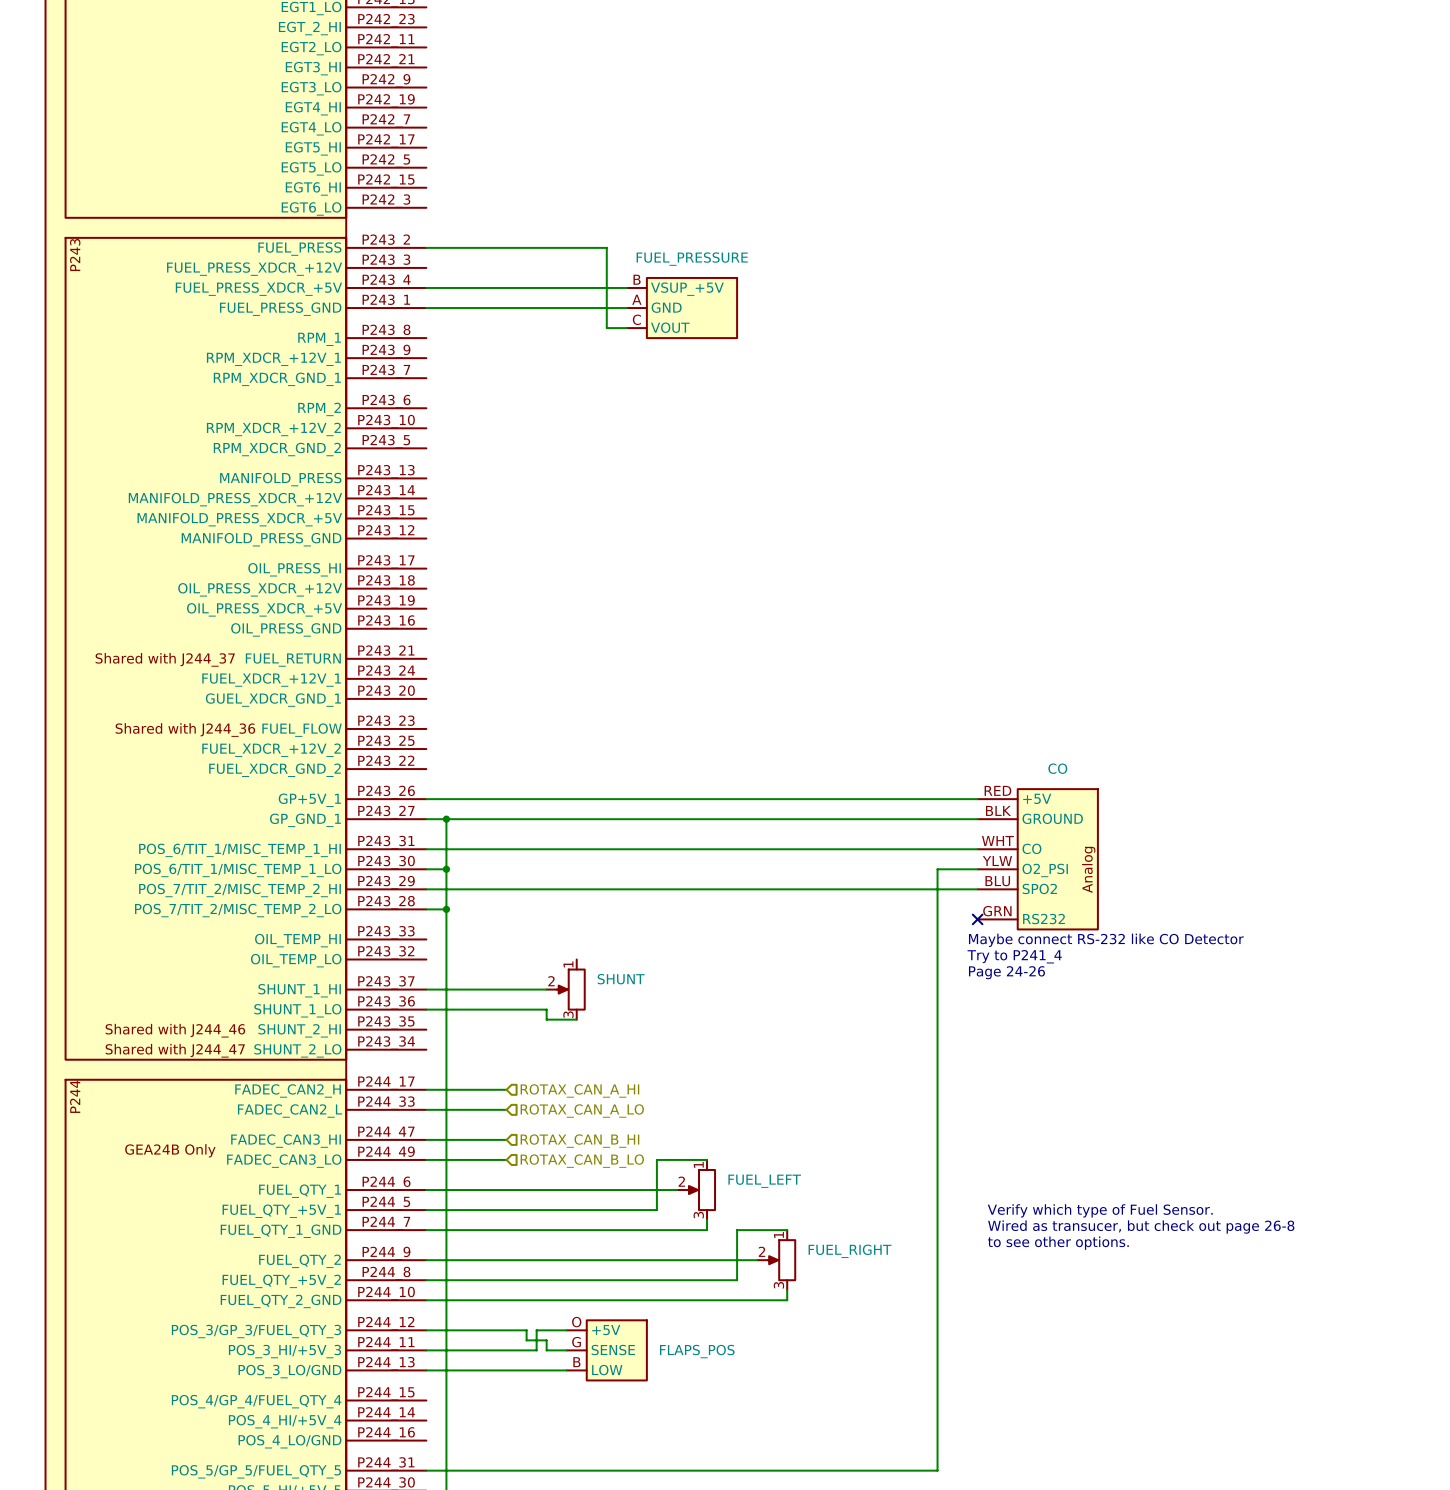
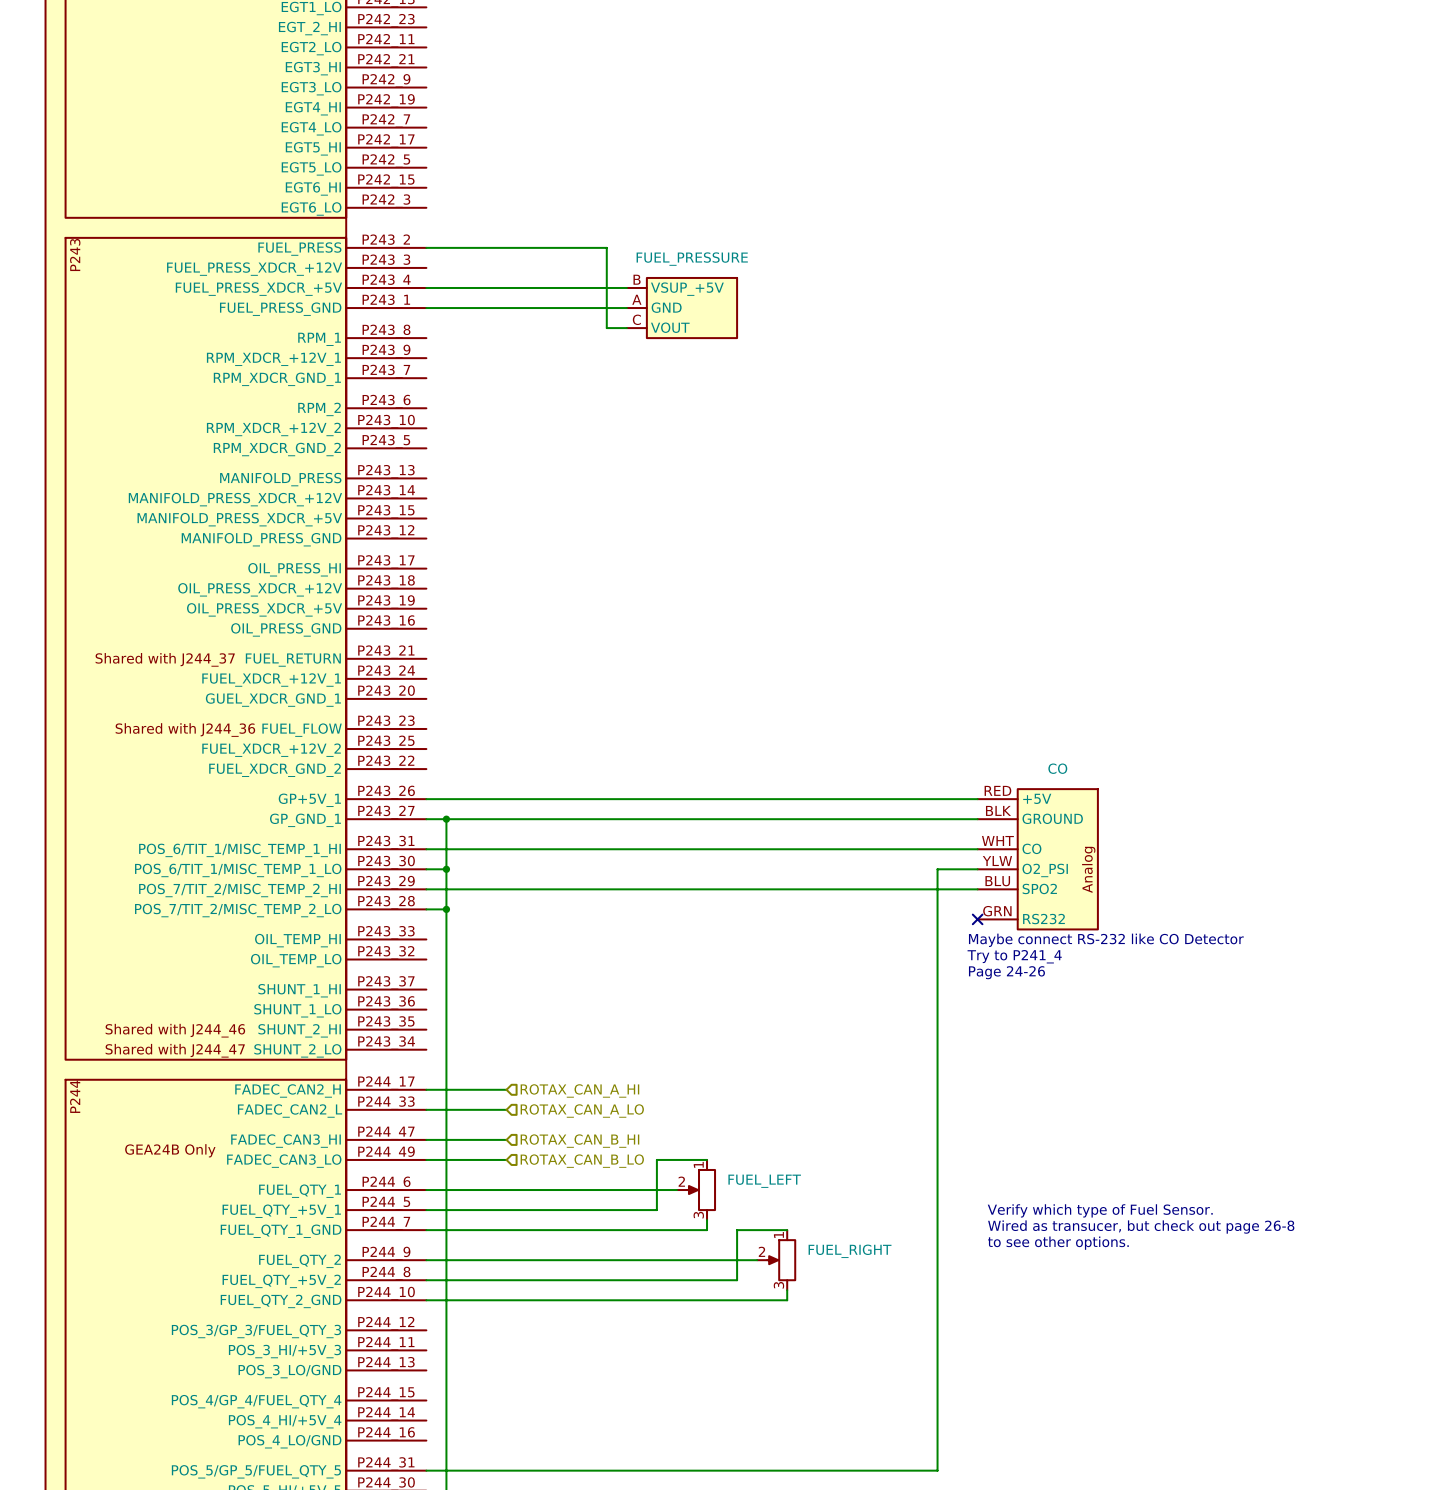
wire: (426, 989) (546, 989) -> none
SHUNT: (566, 989) -> none
wire: (426, 1009) (546, 1009) (546, 1019) (576, 1019) -> none
wire: (426, 1330) (526, 1330) (526, 1340) (546, 1340) (546, 1350) (566, 1350) -> none
wire: (566, 1330) (536, 1330) (536, 1350) (426, 1350) -> none
FLAPS_POS: (606, 1350) -> none
wire: (426, 1370) (566, 1370) -> none

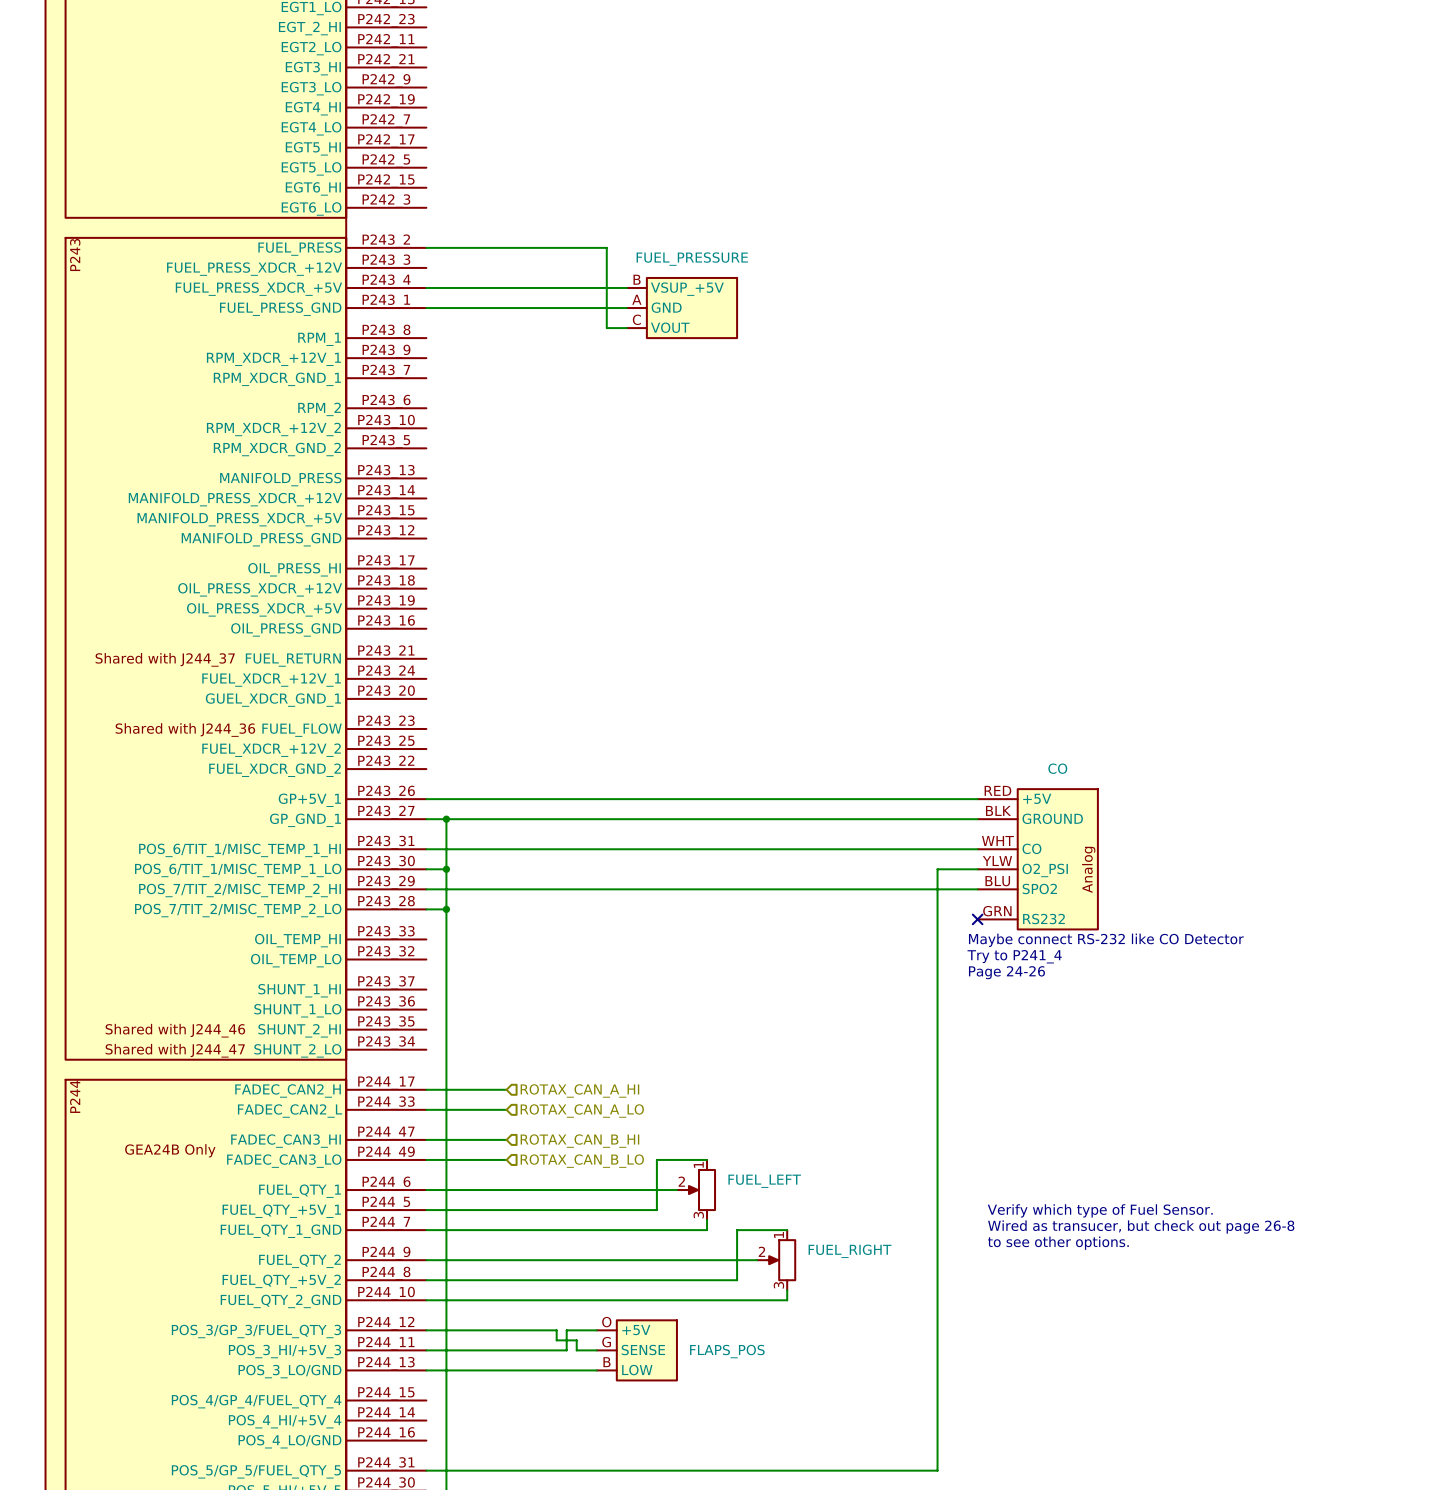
wire: none -> (426, 1330) (556, 1330) (556, 1340) (576, 1340) (576, 1350) (596, 1350)
wire: none -> (596, 1330) (566, 1330) (566, 1350) (426, 1350)
FLAPS_POS: none -> (636, 1350)
wire: none -> (426, 1370) (596, 1370)

